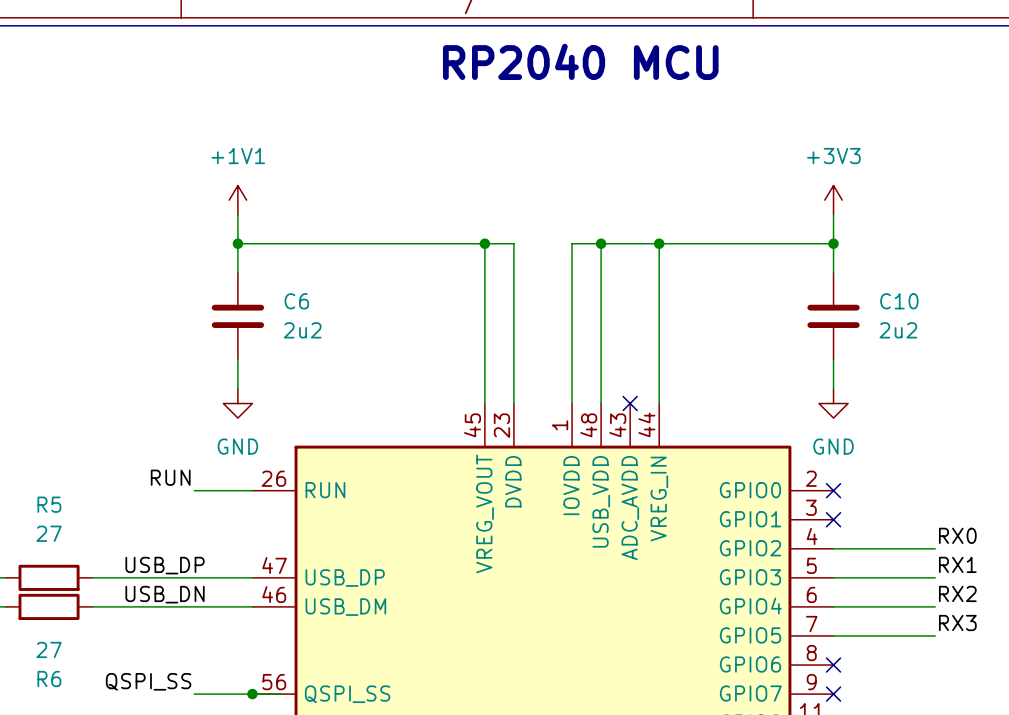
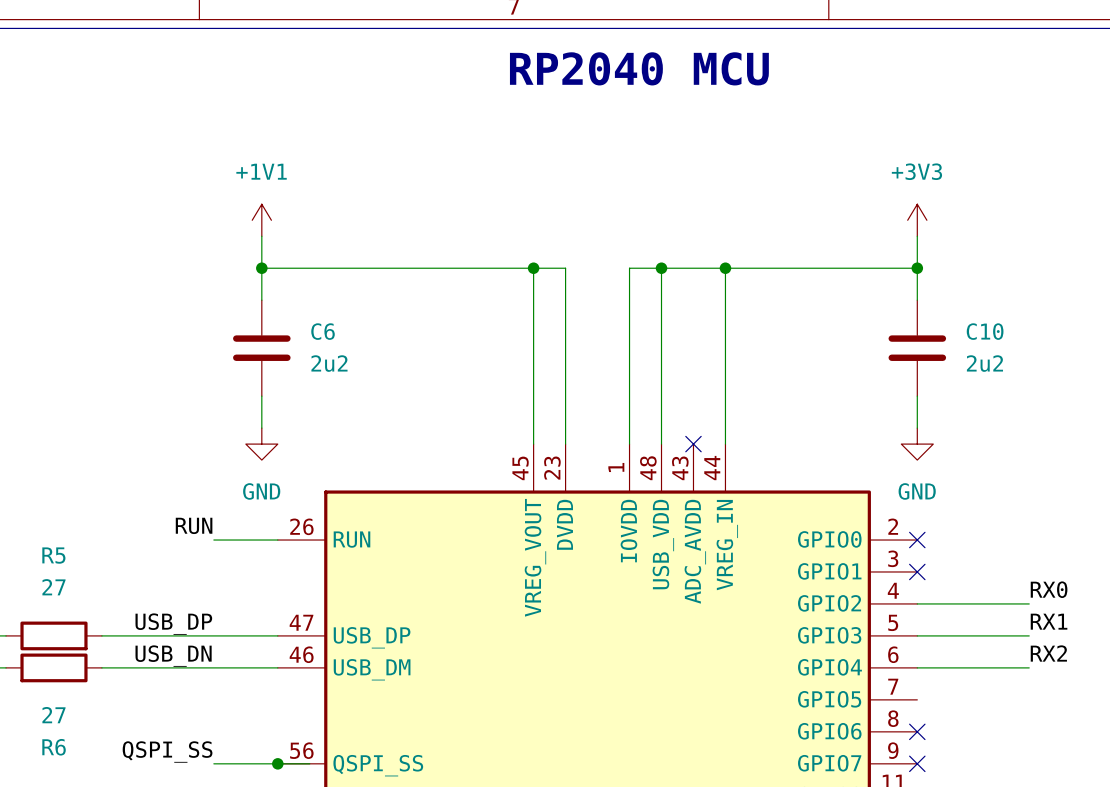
label: RX3 (957, 623) -> none
wire: (833, 635) (935, 635) -> none

